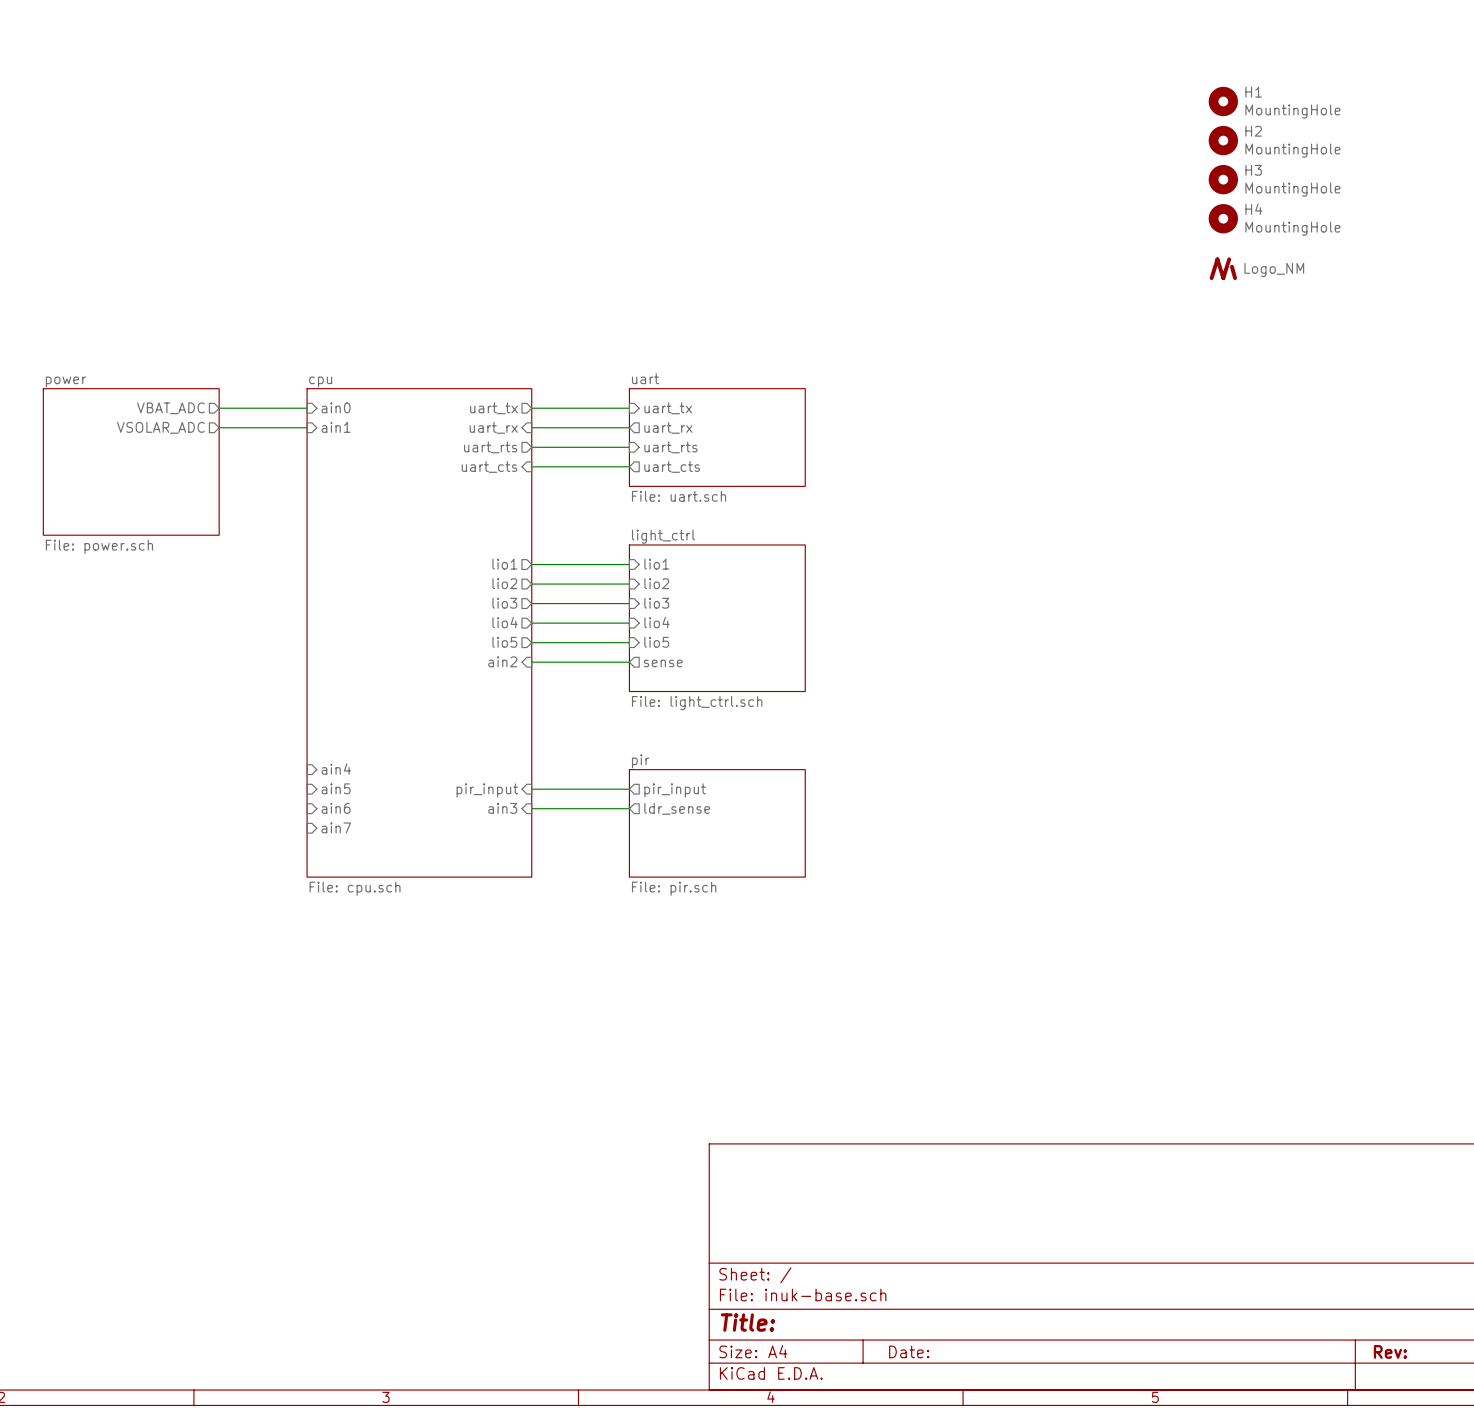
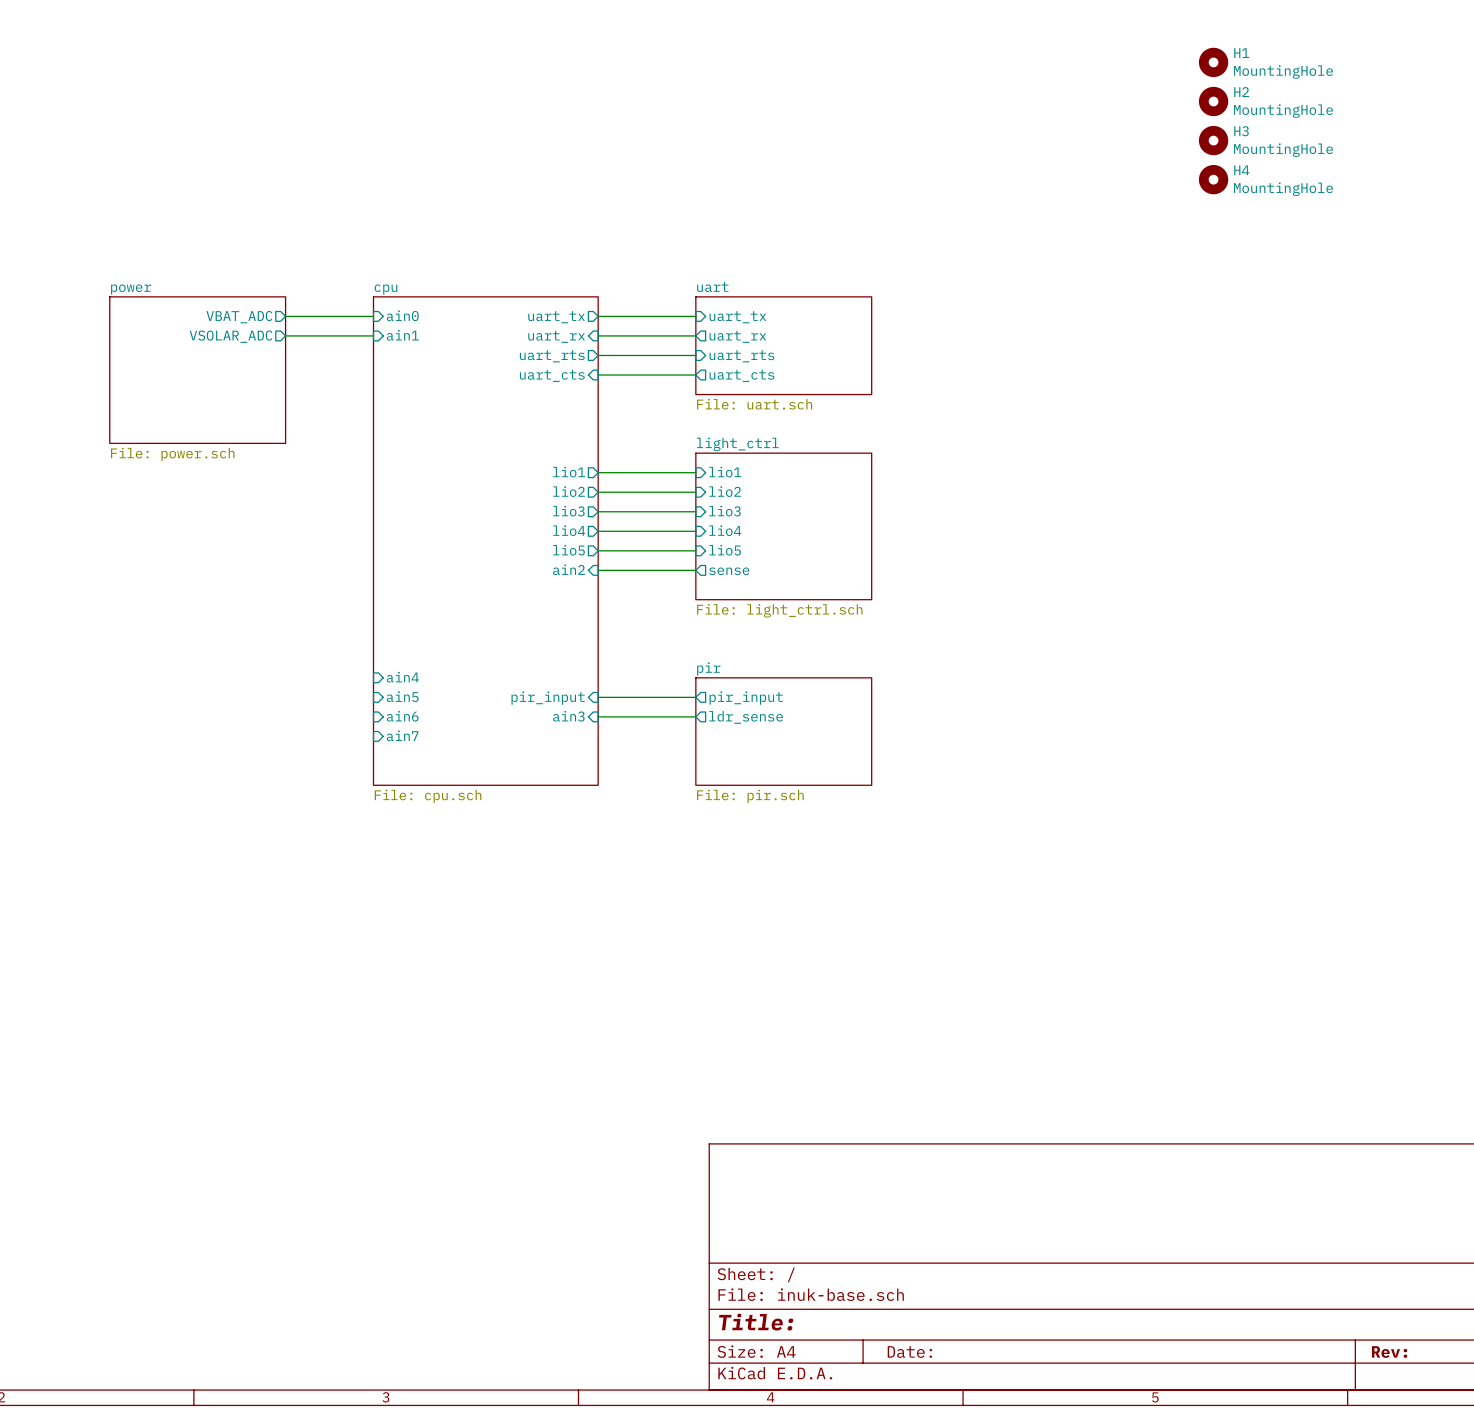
H1 position: (1223, 101) -> (1213, 62)
H2 position: (1223, 140) -> (1213, 101)
H3 position: (1223, 179) -> (1213, 140)
H4 position: (1223, 218) -> (1213, 179)
part: Logo_NM (1223, 268) -> none
sheet pin: none -> uart_tx (556, 317)
sheet pin: none -> uart_tx (737, 317)
sheet pin: none -> uart_rx (556, 336)
sheet pin: none -> uart_rx (737, 336)
sheet pin: none -> uart_rts (552, 356)
sheet pin: none -> uart_rts (741, 356)
sheet pin: none -> uart_cts (552, 375)
sheet pin: none -> uart_cts (741, 375)
sheet pin position: ain0 (336, 407) -> ain0 (402, 315)
sheet pin position: VBAT_ADC (170, 408) -> VBAT_ADC (239, 317)
wire: (219, 408) (307, 408) -> (285, 316) (373, 316)
sheet pin: uart_tx (493, 408) -> none
wire: (531, 408) (629, 408) -> (598, 316) (695, 316)
sheet pin: uart_tx (668, 408) -> none
sheet pin position: VSOLAR_ADC (160, 427) -> VSOLAR_ADC (231, 336)
wire: (219, 427) (307, 427) -> (285, 335) (373, 335)
sheet pin position: ain1 (336, 427) -> ain1 (402, 335)
sheet pin: uart_rx (493, 427) -> none
wire: (531, 427) (629, 427) -> (598, 335) (695, 335)
sheet pin: uart_rx (668, 427) -> none
sheet uart position: (717, 437) -> (783, 345)
sheet pin: uart_rts (490, 447) -> none
wire: (531, 447) (629, 447) -> (598, 355) (695, 355)
sheet pin: uart_rts (670, 447) -> none
sheet power position: (131, 461) -> (197, 370)
sheet pin: uart_cts (489, 466) -> none
wire: (531, 466) (629, 466) -> (598, 375) (695, 375)
sheet pin: uart_cts (672, 466) -> none
sheet pin: none -> lio1 (569, 472)
sheet pin: none -> lio1 (725, 472)
sheet pin: none -> lio2 (569, 491)
sheet pin: none -> lio2 (725, 491)
sheet pin: none -> lio3 (568, 511)
sheet pin: none -> lio3 (725, 511)
sheet pin: none -> lio4 (569, 530)
sheet pin: none -> lio4 (725, 530)
sheet pin: none -> lio5 (569, 550)
sheet pin: none -> lio5 (725, 550)
sheet pin: lio1 (504, 564) -> none
wire: (531, 564) (629, 564) -> (598, 472) (695, 472)
sheet pin: lio1 (656, 564) -> none
sheet pin: lio2 (504, 583) -> none
sheet pin: lio2 (656, 583) -> none
wire: (531, 584) (629, 584) -> (598, 492) (695, 492)
sheet pin: lio3 (504, 603) -> none
wire: (531, 603) (629, 603) -> (598, 511) (695, 511)
sheet pin: lio3 (656, 603) -> none
sheet light_ctrl position: (717, 618) -> (783, 526)
sheet pin: lio4 (505, 622) -> none
sheet pin: lio4 (657, 622) -> none
wire: (531, 623) (629, 623) -> (598, 531) (695, 531)
sheet cpu position: (419, 632) -> (485, 541)
sheet pin: lio5 (504, 642) -> none
wire: (531, 642) (629, 642) -> (598, 550) (695, 550)
sheet pin: lio5 (656, 642) -> none
sheet pin position: ain2 (502, 661) -> ain2 (568, 569)
wire: (531, 662) (629, 662) -> (598, 570) (695, 570)
sheet pin position: sense (663, 663) -> sense (729, 571)
sheet pin: none -> pir_input (548, 698)
sheet pin: none -> pir_input (746, 698)
sheet pin position: ain4 (336, 769) -> ain4 (402, 677)
sheet pin position: ain5 (336, 788) -> ain5 (402, 696)
wire: (531, 789) (629, 789) -> (598, 697) (695, 697)
sheet pin: pir_input (487, 790) -> none
sheet pin: pir_input (675, 790) -> none
sheet pin position: ain6 (336, 808) -> ain6 (402, 716)
sheet pin position: ain3 (502, 808) -> ain3 (568, 716)
wire: (531, 808) (629, 808) -> (598, 716) (695, 716)
sheet pin position: ldr_sense (677, 808) -> ldr_sense (746, 717)
sheet pir position: (717, 823) -> (783, 731)
sheet pin position: ain7 (336, 827) -> ain7 (402, 735)

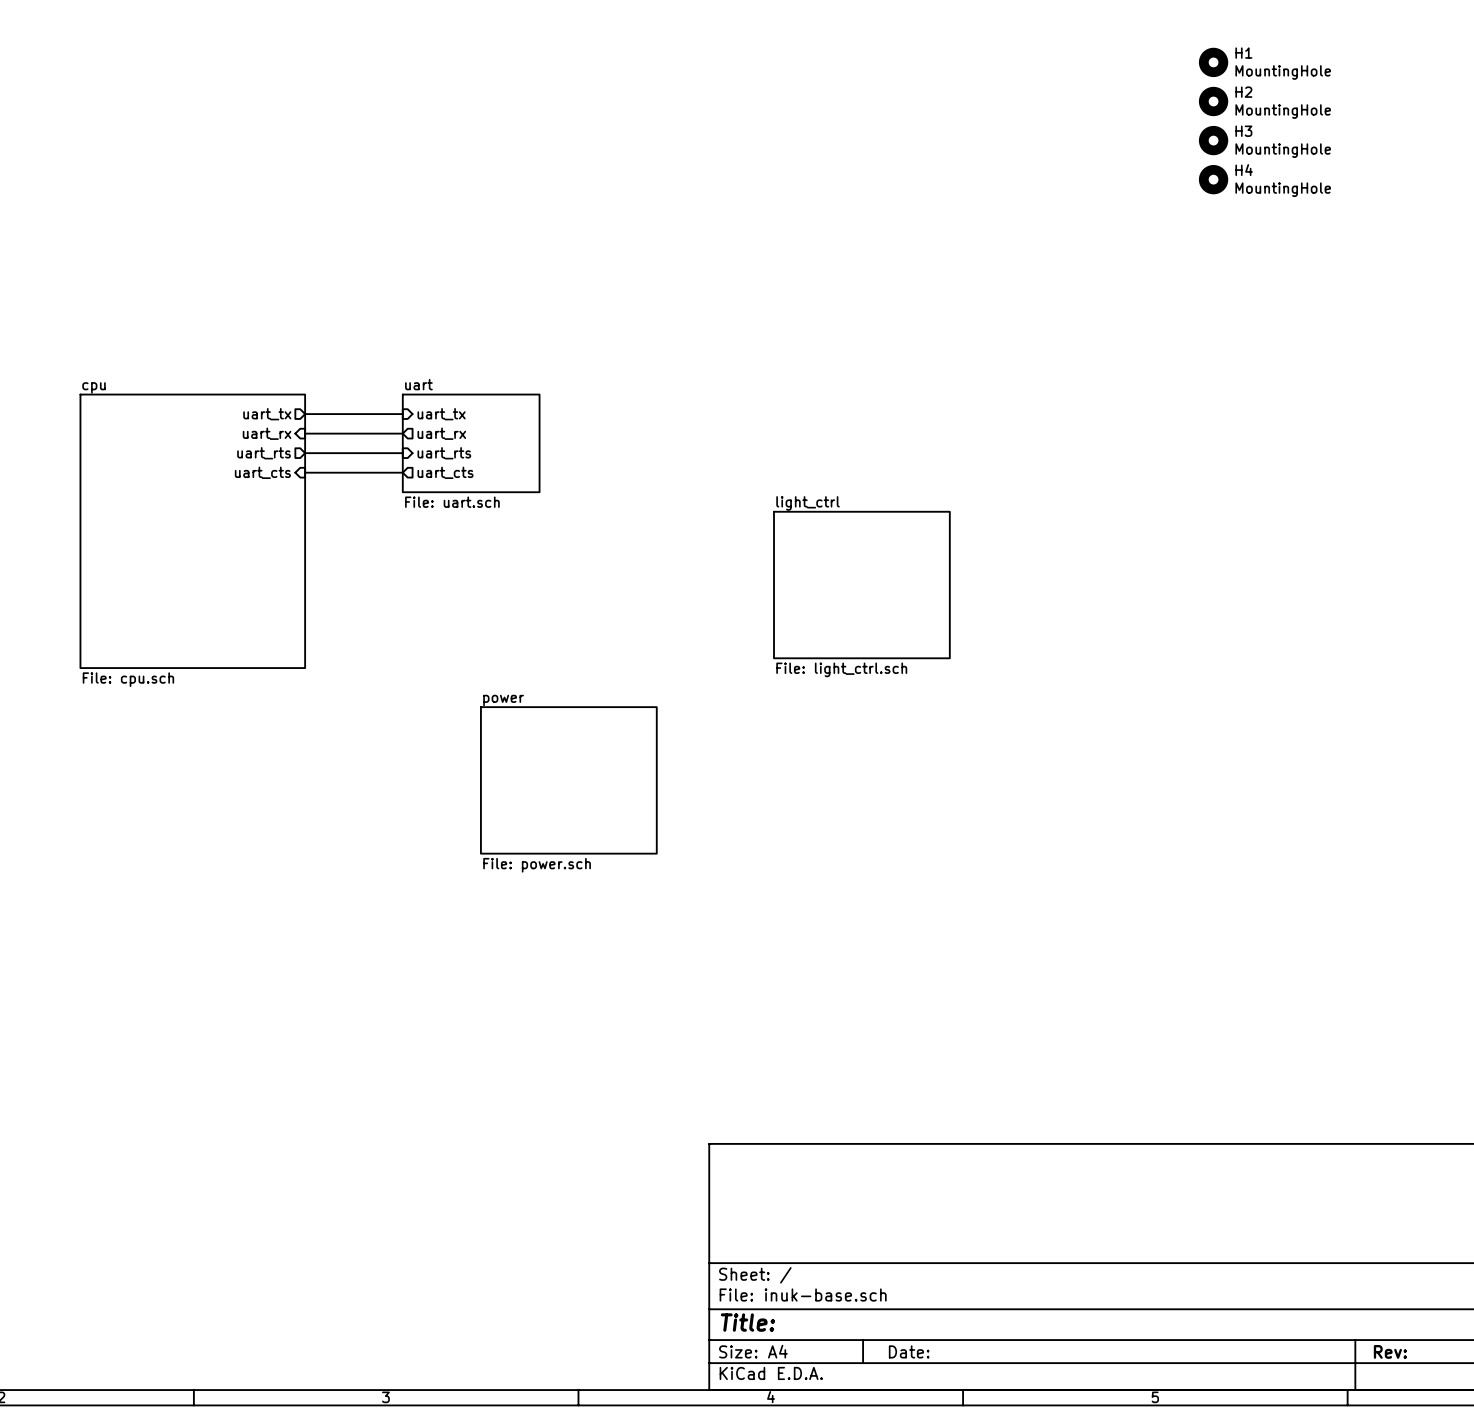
sheet pin: ain0 (402, 315) -> none
wire: (285, 316) (373, 316) -> none
wire: (598, 316) (695, 316) -> none
sheet pin: VBAT_ADC (239, 317) -> none
sheet pin: uart_tx (556, 317) -> none
sheet pin: uart_tx (737, 317) -> none
wire: (285, 335) (373, 335) -> none
sheet pin: ain1 (402, 335) -> none
wire: (598, 335) (695, 335) -> none
sheet pin: VSOLAR_ADC (231, 336) -> none
sheet pin: uart_rx (556, 336) -> none
sheet pin: uart_rx (737, 336) -> none
sheet uart: File: uart.sch (783, 345) -> none
wire: (598, 355) (695, 355) -> none
sheet pin: uart_rts (552, 356) -> none
sheet pin: uart_rts (741, 356) -> none
sheet power: File: power.sch (197, 370) -> none
sheet pin: uart_cts (552, 375) -> none
wire: (598, 375) (695, 375) -> none
sheet pin: uart_cts (741, 375) -> none
sheet pin: none -> uart_tx (267, 414)
wire: none -> (305, 414) (402, 414)
sheet pin: none -> uart_tx (441, 414)
wire: none -> (305, 433) (402, 433)
sheet pin: none -> uart_rx (267, 433)
sheet pin: none -> uart_rx (441, 433)
sheet uart: none -> File: uart.sch (471, 443)
sheet pin: none -> uart_rts (264, 453)
wire: none -> (305, 453) (402, 453)
sheet pin: none -> uart_rts (444, 453)
wire: none -> (305, 472) (402, 472)
sheet pin: lio1 (569, 472) -> none
wire: (598, 472) (695, 472) -> none
sheet pin: lio1 (725, 472) -> none
sheet pin: none -> uart_cts (262, 472)
sheet pin: none -> uart_cts (445, 472)
sheet pin: lio2 (569, 491) -> none
sheet pin: lio2 (725, 491) -> none
wire: (598, 492) (695, 492) -> none
sheet pin: lio3 (568, 511) -> none
wire: (598, 511) (695, 511) -> none
sheet pin: lio3 (725, 511) -> none
sheet light_ctrl position: (783, 526) -> (861, 585)
sheet pin: lio4 (569, 530) -> none
sheet pin: lio4 (725, 530) -> none
sheet cpu: none -> File: cpu.sch (192, 531)
wire: (598, 531) (695, 531) -> none
sheet cpu: File: cpu.sch (485, 541) -> none
sheet pin: lio5 (569, 550) -> none
wire: (598, 550) (695, 550) -> none
sheet pin: lio5 (725, 550) -> none
sheet pin: ain2 (568, 569) -> none
wire: (598, 570) (695, 570) -> none
sheet pin: sense (729, 571) -> none
sheet pin: ain4 (402, 677) -> none
sheet pin: ain5 (402, 696) -> none
wire: (598, 697) (695, 697) -> none
sheet pin: pir_input (548, 698) -> none
sheet pin: pir_input (746, 698) -> none
sheet pin: ain6 (402, 716) -> none
sheet pin: ain3 (568, 716) -> none
wire: (598, 716) (695, 716) -> none
sheet pin: ldr_sense (746, 717) -> none
sheet pir: File: pir.sch (783, 731) -> none
sheet pin: ain7 (402, 735) -> none
sheet power: none -> File: power.sch (568, 780)

